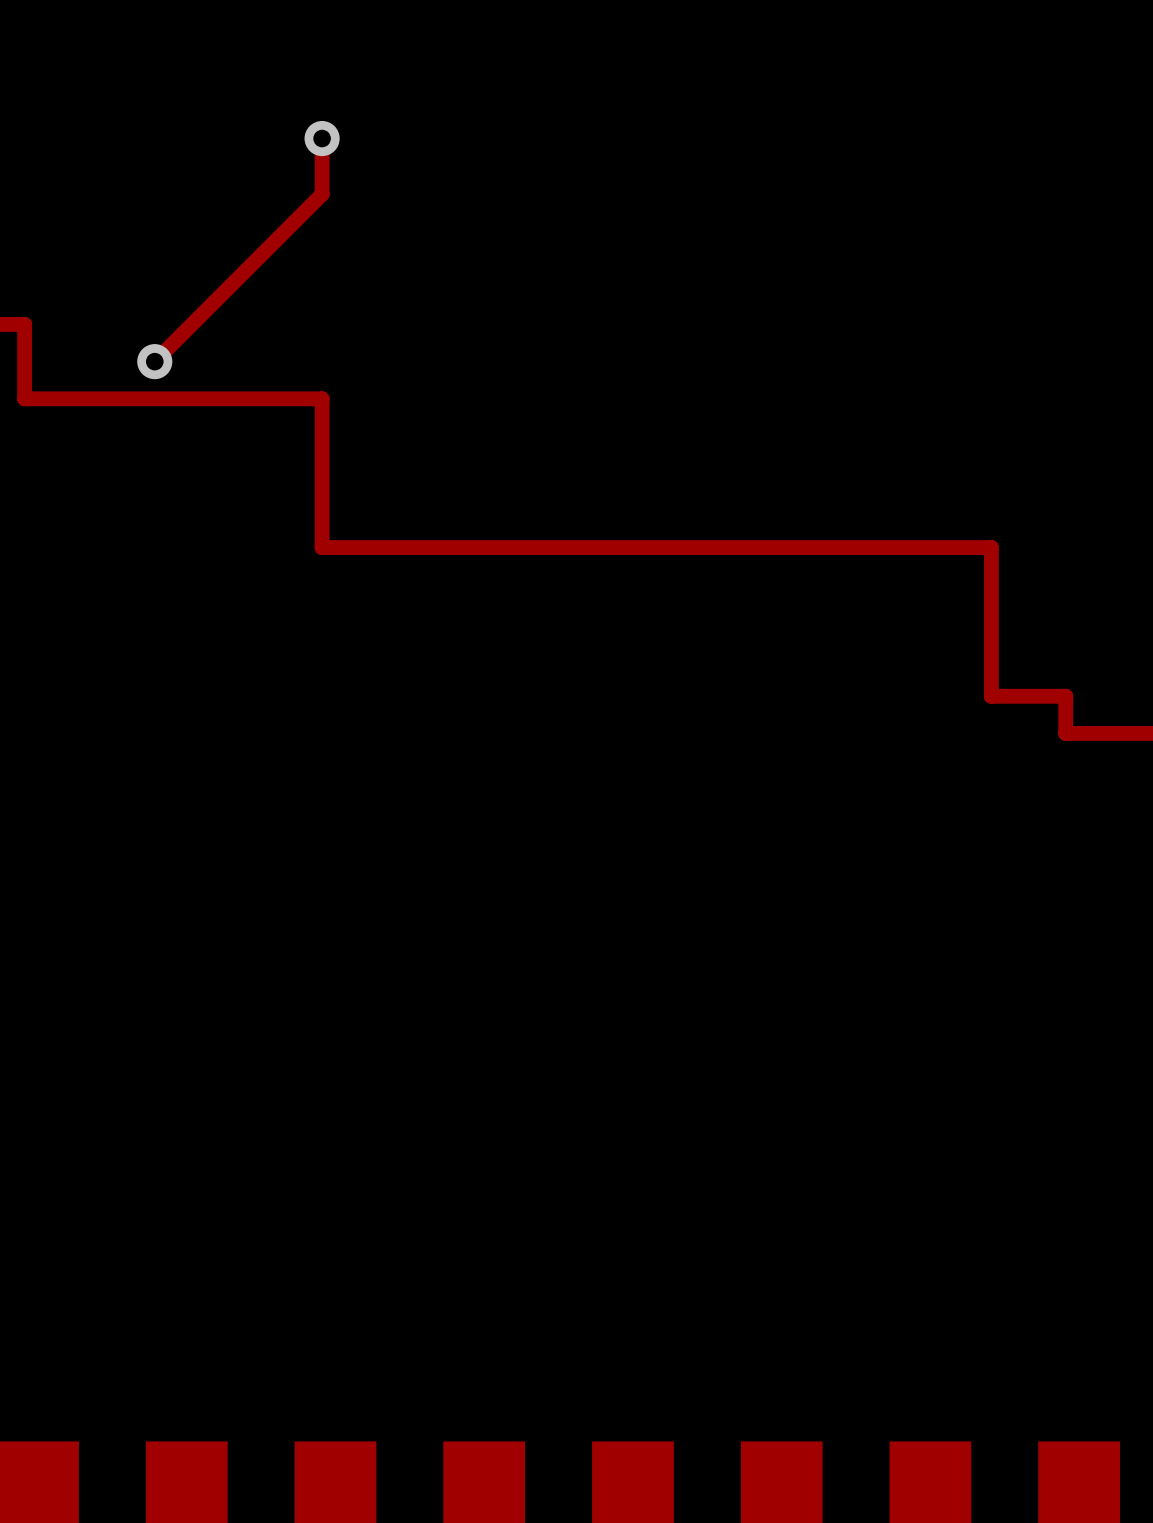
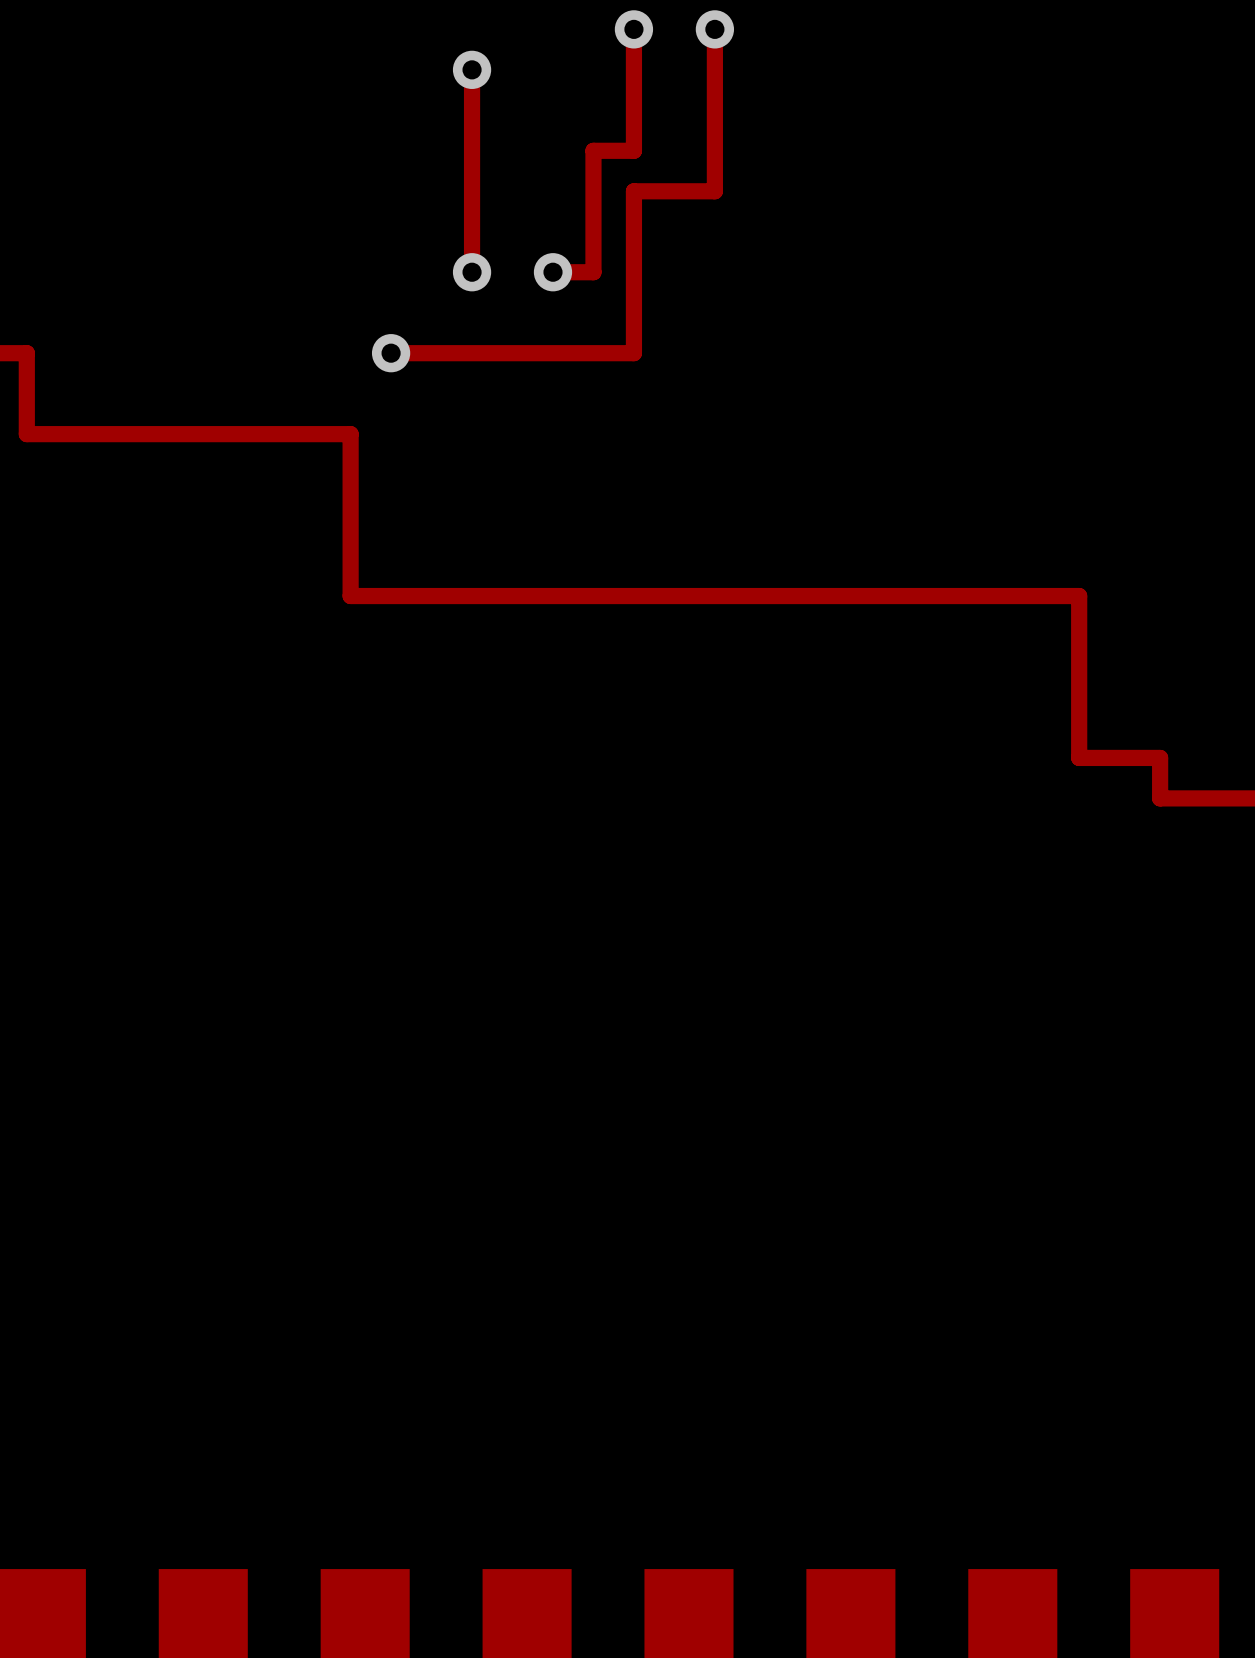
track: none -> (633, 29) (633, 150) (593, 150) (593, 272) (552, 272)
via: none -> (633, 29)
track: none -> (714, 29) (714, 191) (633, 191) (633, 353) (391, 353)
via: none -> (714, 29)
track: none -> (472, 69) (472, 272)
via: none -> (472, 69)
track: (322, 138) (322, 194) (154, 361) -> none
via: (322, 138) -> none
via: none -> (472, 272)
via: none -> (552, 272)
via: none -> (391, 353)
via: (154, 361) -> none

